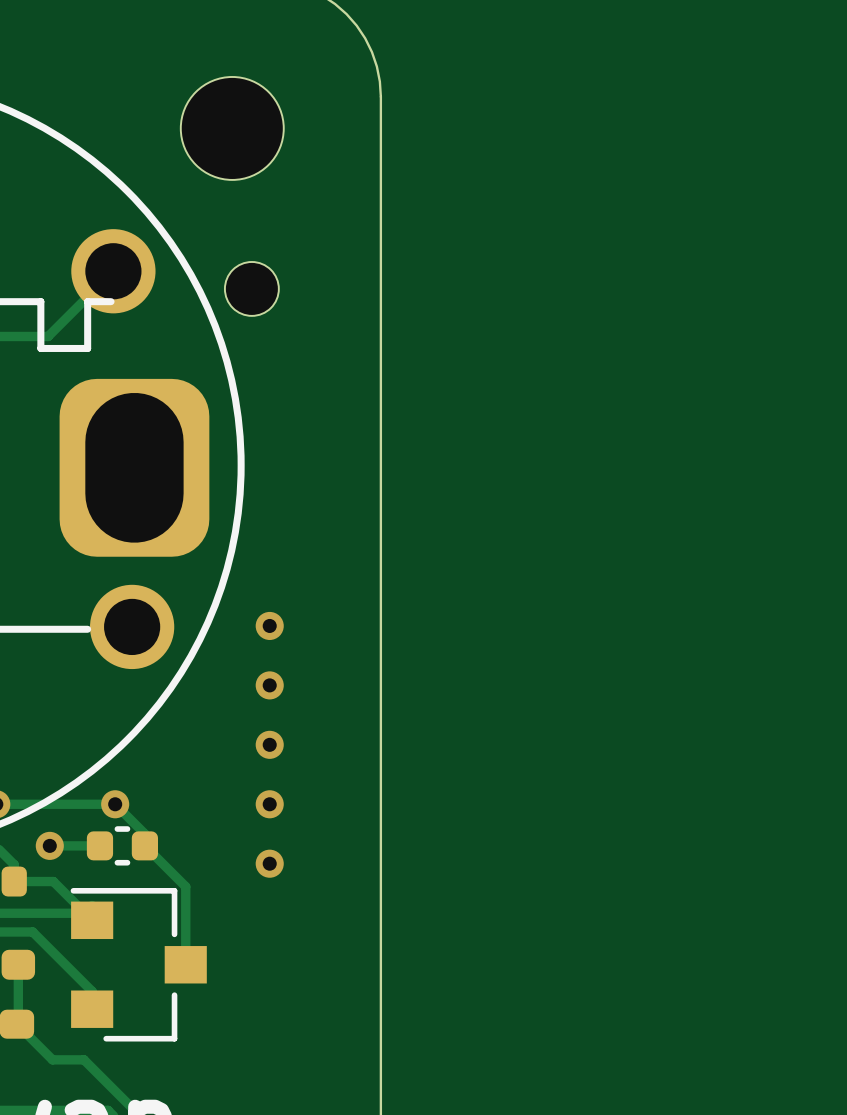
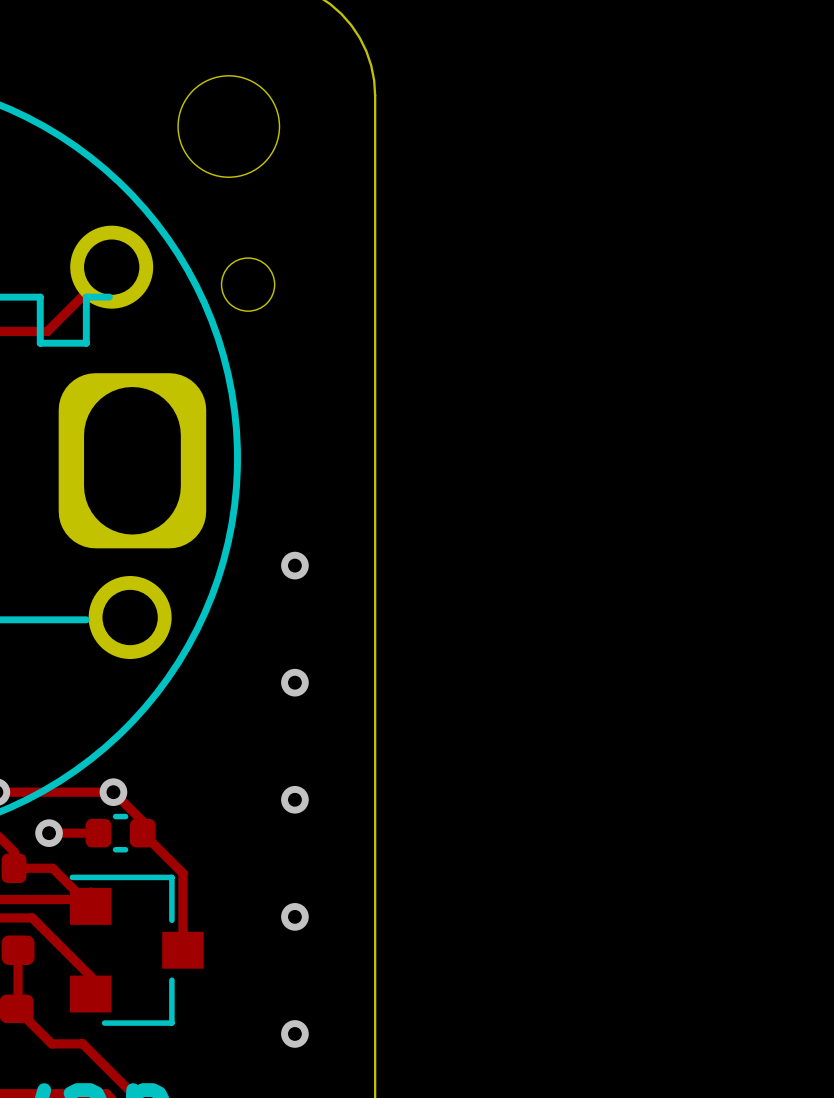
via: none -> (294, 565)
via: (269, 625) -> none
via: (269, 685) -> none
via: none -> (294, 682)
via: (269, 744) -> none
via: (269, 804) -> none
via: none -> (294, 799)
via: (269, 863) -> none
via: none -> (294, 916)
via: none -> (294, 1033)

